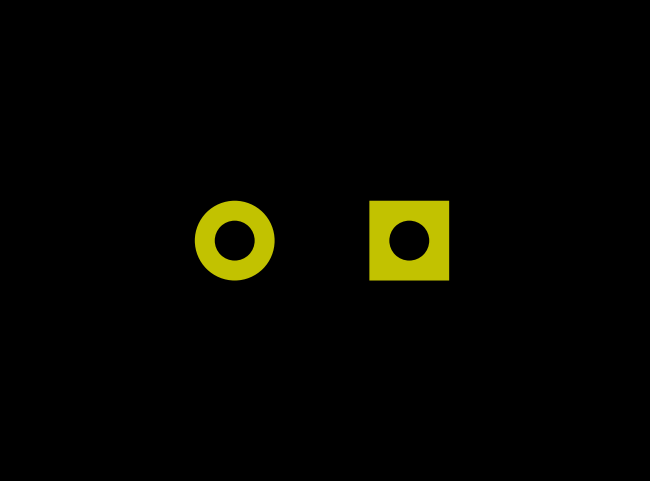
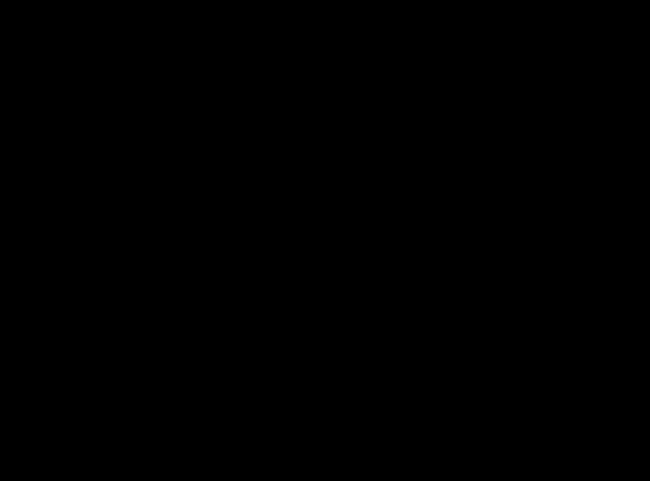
part: (321, 240) -> none

